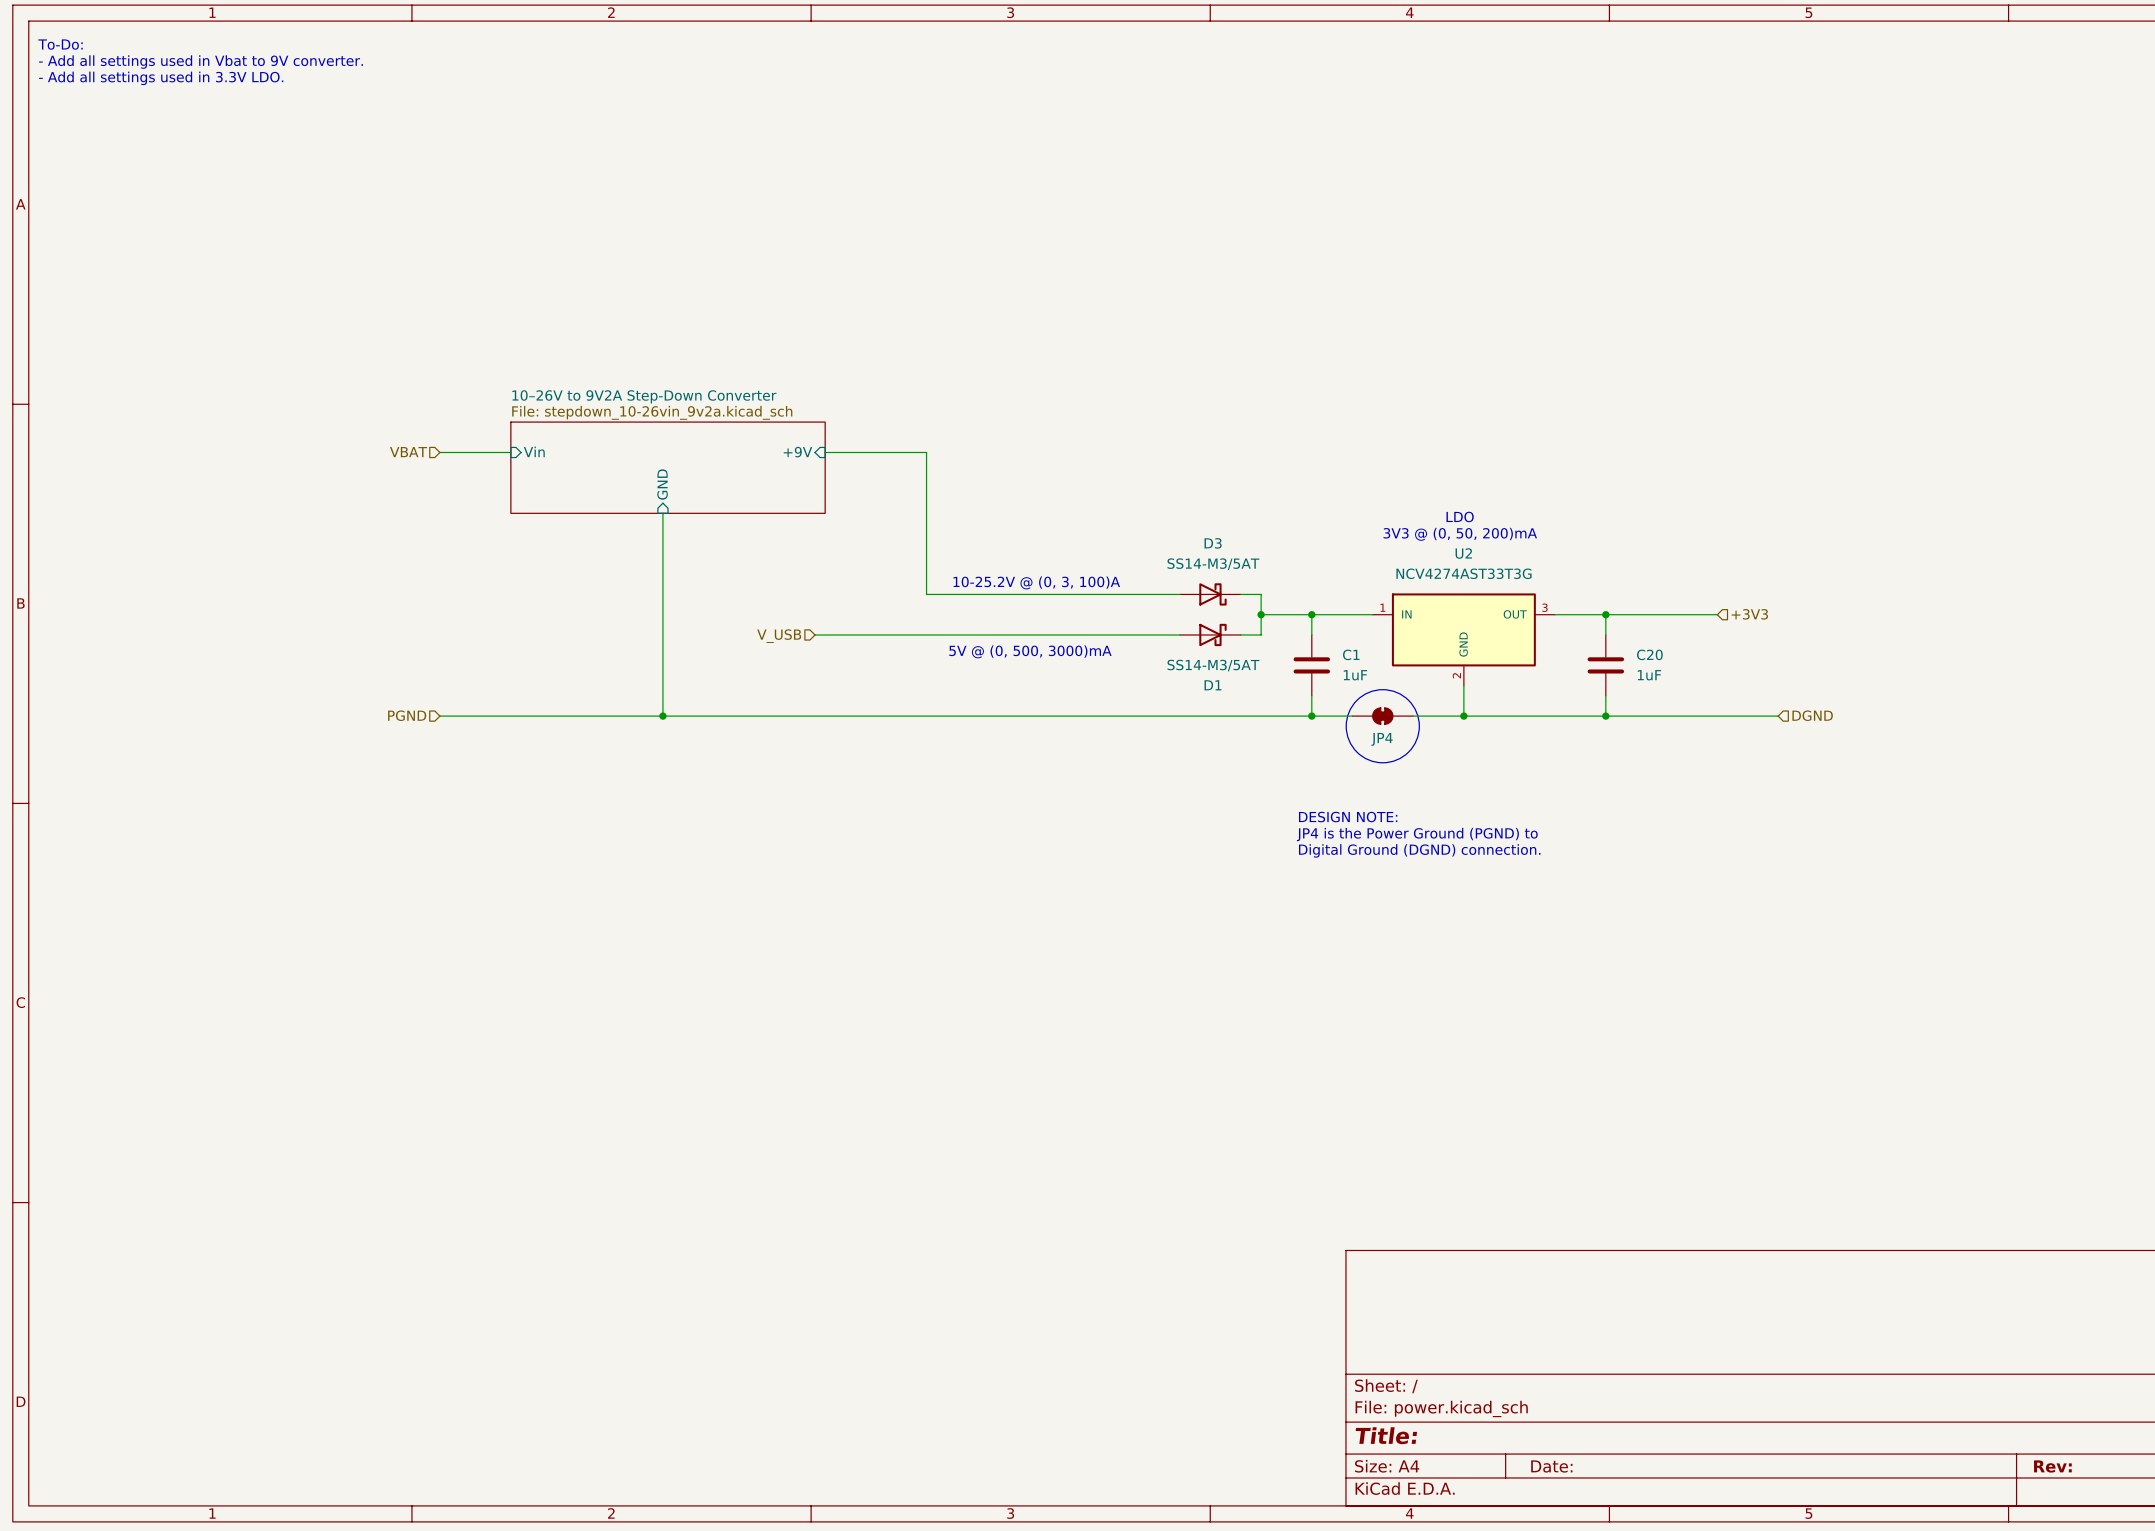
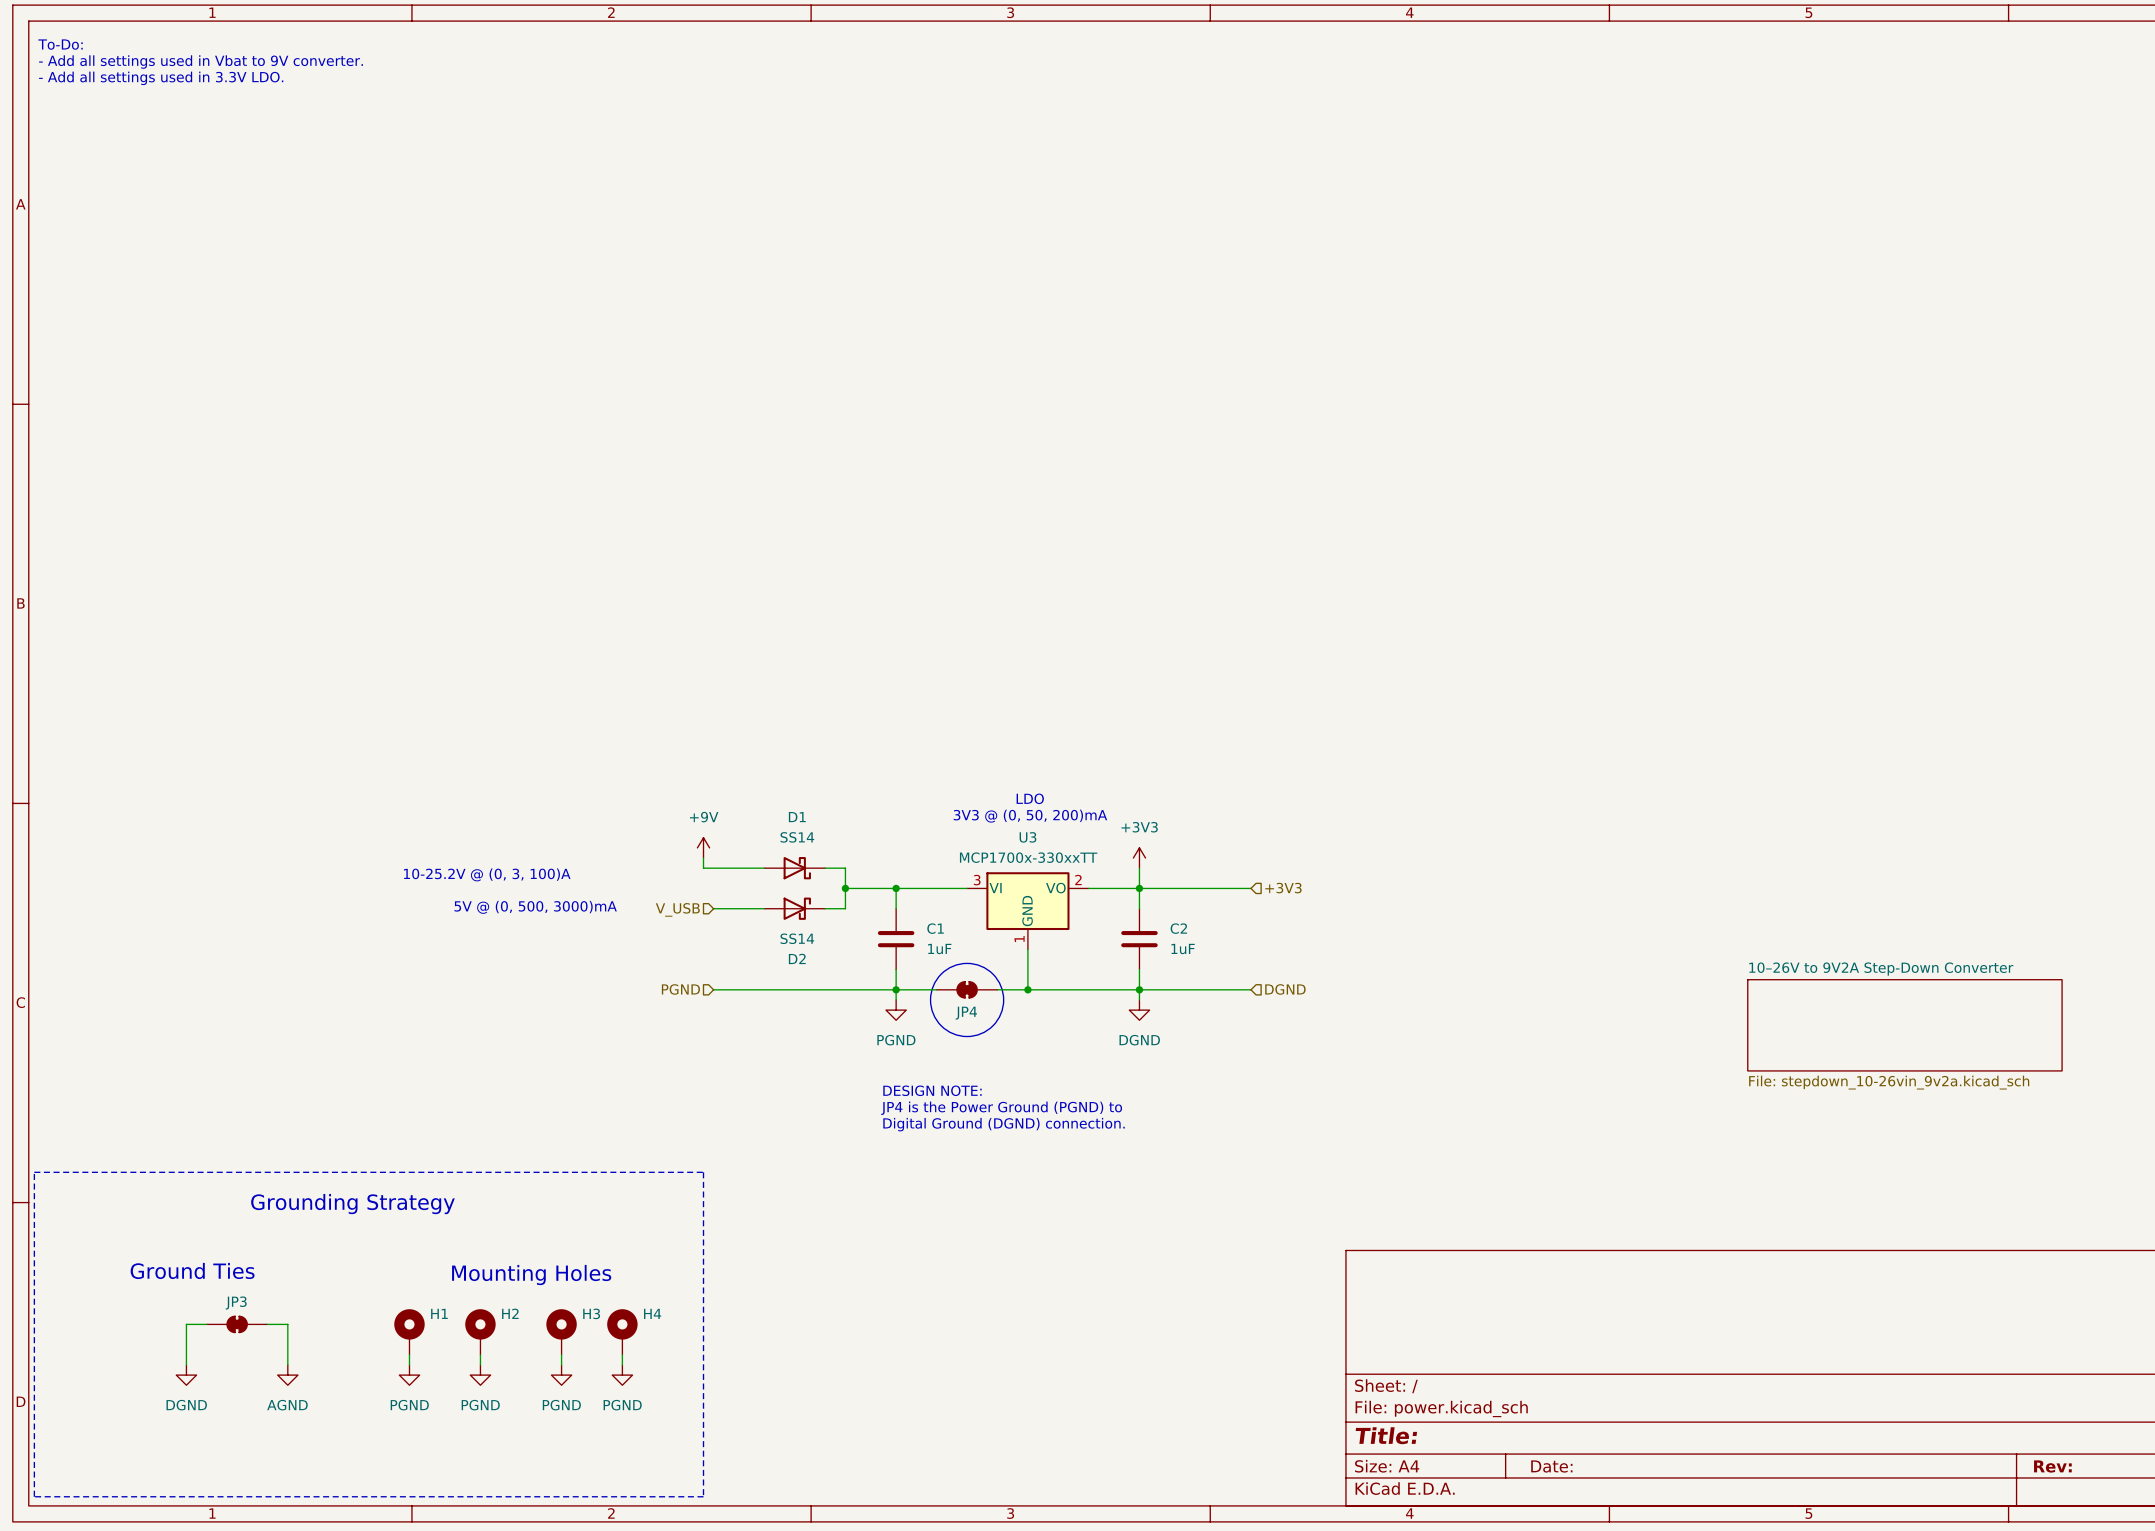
sheet 10–26V to 9V2A Step-Down Converter name position: 10–26V to 9V2A Step-Down Converter (644, 396) -> 10–26V to 9V2A Step-Down Converter (1881, 969)
sheet 10–26V to 9V2A Step-Down Converter value position: File: stepdown_10-26vin_9v2a.kicad_sch (652, 412) -> File: stepdown_10-26vin_9v2a.kicad_sch (1889, 1082)
sheet pin: Vin (534, 451) -> none
hierarchical label: VBAT (408, 452) -> none
wire: (439, 452) (510, 452) -> none
sheet pin: +9V (797, 452) -> none
wire: (825, 452) (926, 452) (926, 594) (1180, 594) -> none
sheet 10–26V to 9V2A Step-Down Converter position: (668, 467) -> (1904, 1025)
sheet pin: GND (662, 484) -> none
wire: (662, 513) (662, 716) -> none
text: LDO (1460, 516) -> none
text: 3V3 @ (0, 50, 200)mA (1460, 534) -> none
text: 10-25.2V @ (0, 3, 100)A (1036, 582) -> none
D3: SS14-M3/5AT (1210, 594) -> none
wire: (1240, 594) (1261, 594) (1261, 634) (1240, 634) -> none
wire: (1261, 614) (1372, 614) -> none
junction: (1261, 614) -> none
wire: (1311, 614) (1311, 634) -> none
junction: (1311, 614) -> none
wire: (1555, 614) (1717, 614) -> none
wire: (1605, 614) (1605, 634) -> none
junction: (1605, 614) -> none
hierarchical label: +3V3 (1749, 614) -> none
wire: (815, 634) (1180, 634) -> none
D1 position: (1210, 634) -> (794, 868)
D1 flip: as is (1212, 634) -> up-down (797, 868)
hierarchical label: V_USB (779, 636) -> none
U2: NCV4274AST33T3G (1463, 639) -> none
text: 5V @ (0, 500, 3000)mA (1030, 651) -> none
D1 value: SS14-M3/5AT (1213, 665) -> SS14 (797, 837)
C1 position: (1311, 665) -> (896, 939)
C20: 1uF (1605, 665) -> none
wire: (1463, 685) (1463, 716) -> none
drawing: [1346, 689, 1420, 763] -> none
wire: (1311, 695) (1311, 716) -> none
wire: (1605, 695) (1605, 716) -> none
hierarchical label: PGND (407, 715) -> none
hierarchical label: DGND (1812, 715) -> none
wire: (439, 716) (1352, 716) -> none
junction: (662, 716) -> none
junction: (1311, 716) -> none
JP4 position: (1382, 716) -> (967, 989)
wire: (1413, 716) (1778, 716) -> none
junction: (1463, 716) -> none
junction: (1605, 716) -> none
text: none -> LDO (1030, 798)
text: none -> 3V3 @ (0, 50, 200)mA (1030, 816)
text: DESIGN NOTE: (1348, 817) -> none
text: JP4 is the Power Ground (PGND) to (1417, 834) -> none
power symbol: none -> +9V (703, 847)
text: Digital Ground (DGND) connection. (1419, 850) -> none
wire: none -> (703, 858) (703, 868) (764, 868)
power symbol: none -> +3V3 (1139, 858)
wire: none -> (825, 868) (845, 868) (845, 908) (825, 908)
wire: none -> (1139, 868) (1139, 908)
text: none -> 10-25.2V @ (0, 3, 100)A (487, 874)
wire: none -> (845, 888) (967, 888)
junction: none -> (845, 888)
wire: none -> (896, 888) (896, 908)
junction: none -> (896, 888)
wire: none -> (1088, 888) (1250, 888)
junction: none -> (1139, 888)
hierarchical label: none -> +3V3 (1283, 888)
text: none -> 5V @ (0, 500, 3000)mA (535, 907)
wire: none -> (713, 908) (764, 908)
D2: none -> SS14 (794, 908)
hierarchical label: none -> V_USB (677, 909)
U3: none -> MCP1700x-330xxTT (1027, 910)
C2: none -> 1uF (1139, 939)
wire: none -> (1027, 949) (1027, 989)
drawing: none -> [930, 963, 1004, 1037]
wire: none -> (896, 969) (896, 999)
wire: none -> (1139, 969) (1139, 999)
hierarchical label: none -> PGND (680, 989)
wire: none -> (713, 989) (936, 989)
junction: none -> (896, 989)
wire: none -> (997, 989) (1250, 989)
junction: none -> (1027, 989)
junction: none -> (1139, 989)
hierarchical label: none -> DGND (1285, 989)
power symbol: none -> PGND (896, 1010)
power symbol: none -> DGND (1139, 1010)
text: none -> DESIGN NOTE: (932, 1090)
text: none -> JP4 is the Power Ground (PGND) to (1001, 1108)
text: none -> Digital Ground (DGND) connection. (1004, 1124)
line: none -> (34, 1172) (703, 1172) (703, 1496) (34, 1496) (34, 1172)
text: none -> Grounding Strategy (352, 1204)
text: none -> Ground Ties (192, 1270)
text: none -> Mounting Holes (531, 1275)
wire: none -> (206, 1324) (186, 1324) (186, 1364)
JP3: none -> (237, 1324)
wire: none -> (267, 1324) (287, 1324) (287, 1364)
H1: none -> (409, 1332)
H2: none -> (480, 1332)
H3: none -> (561, 1332)
H4: none -> (622, 1332)
wire: none -> (409, 1354) (409, 1364)
wire: none -> (480, 1354) (480, 1364)
wire: none -> (561, 1354) (561, 1364)
wire: none -> (622, 1354) (622, 1364)
power symbol: none -> DGND (186, 1375)
power symbol: none -> AGND (287, 1375)
power symbol: none -> PGND (409, 1375)
power symbol: none -> PGND (480, 1375)
power symbol: none -> PGND (561, 1375)
power symbol: none -> PGND (622, 1375)

